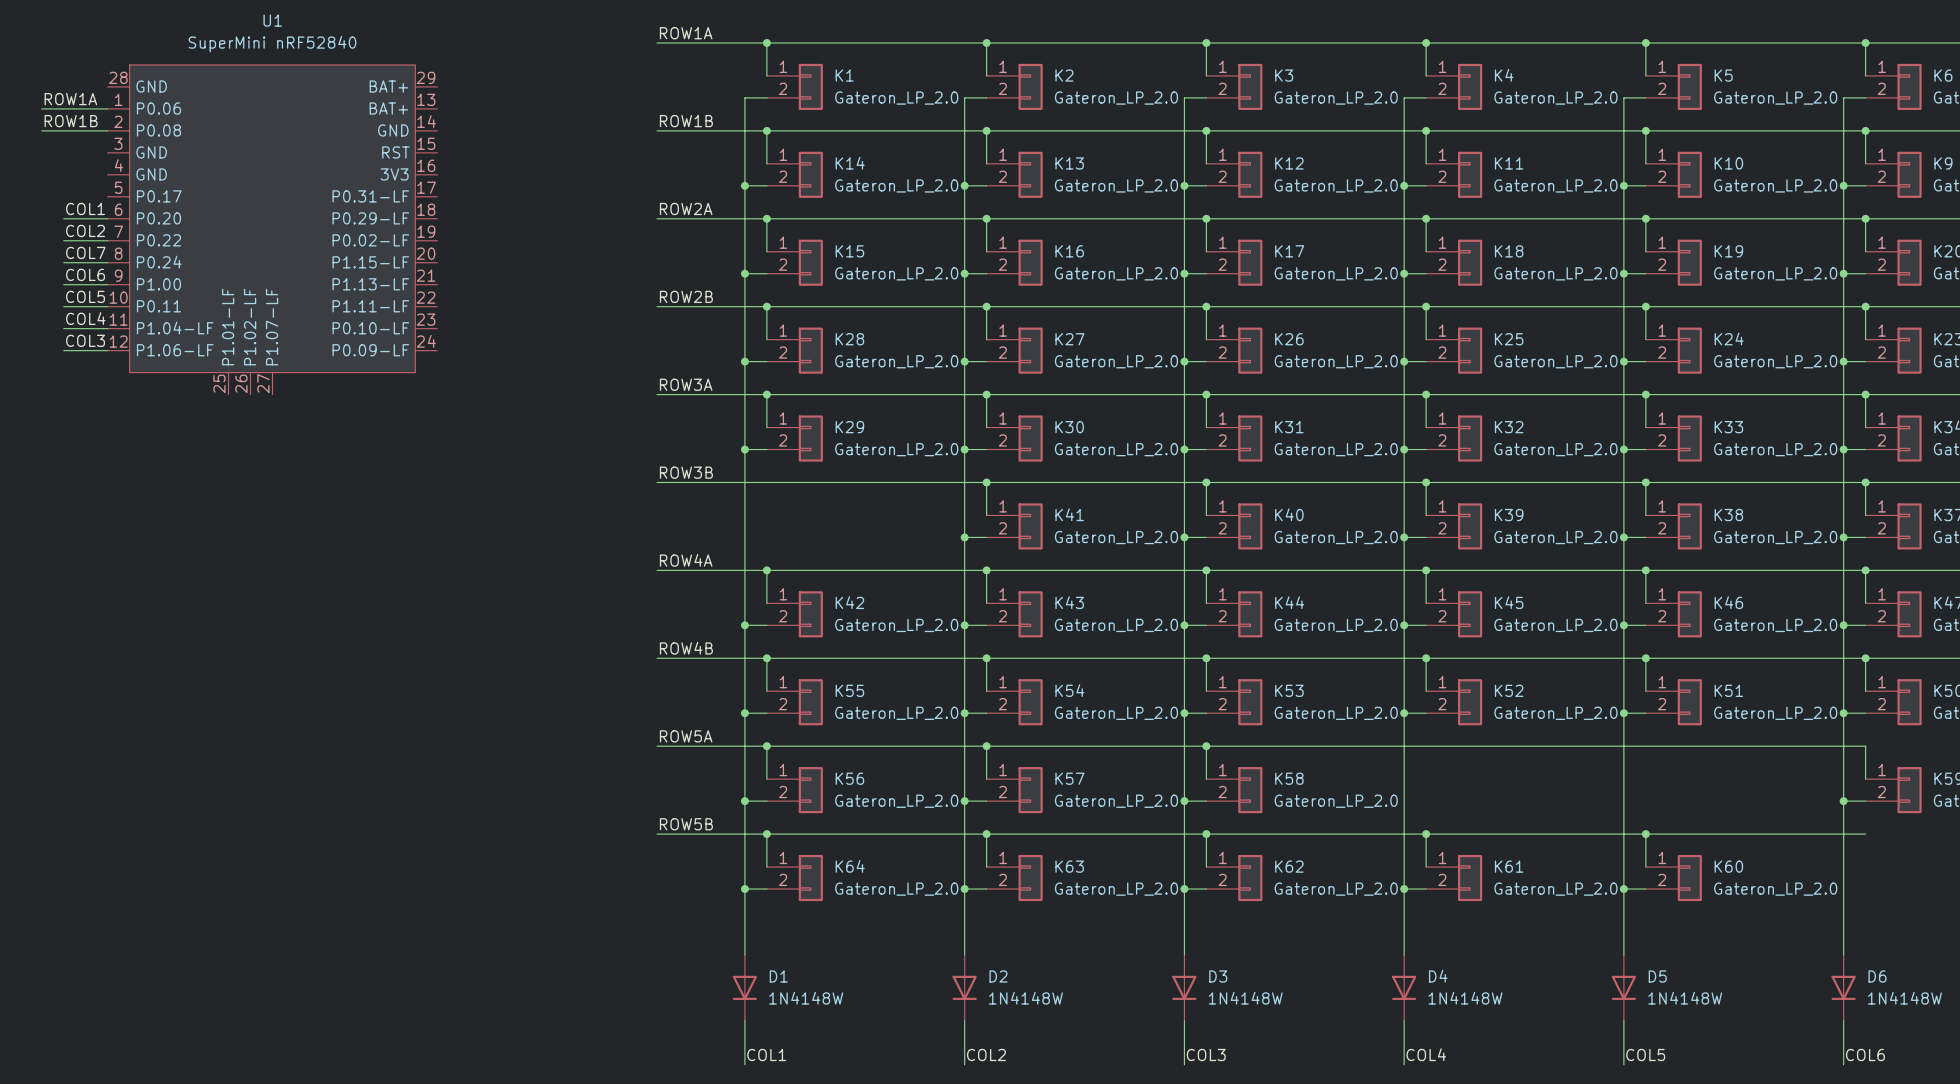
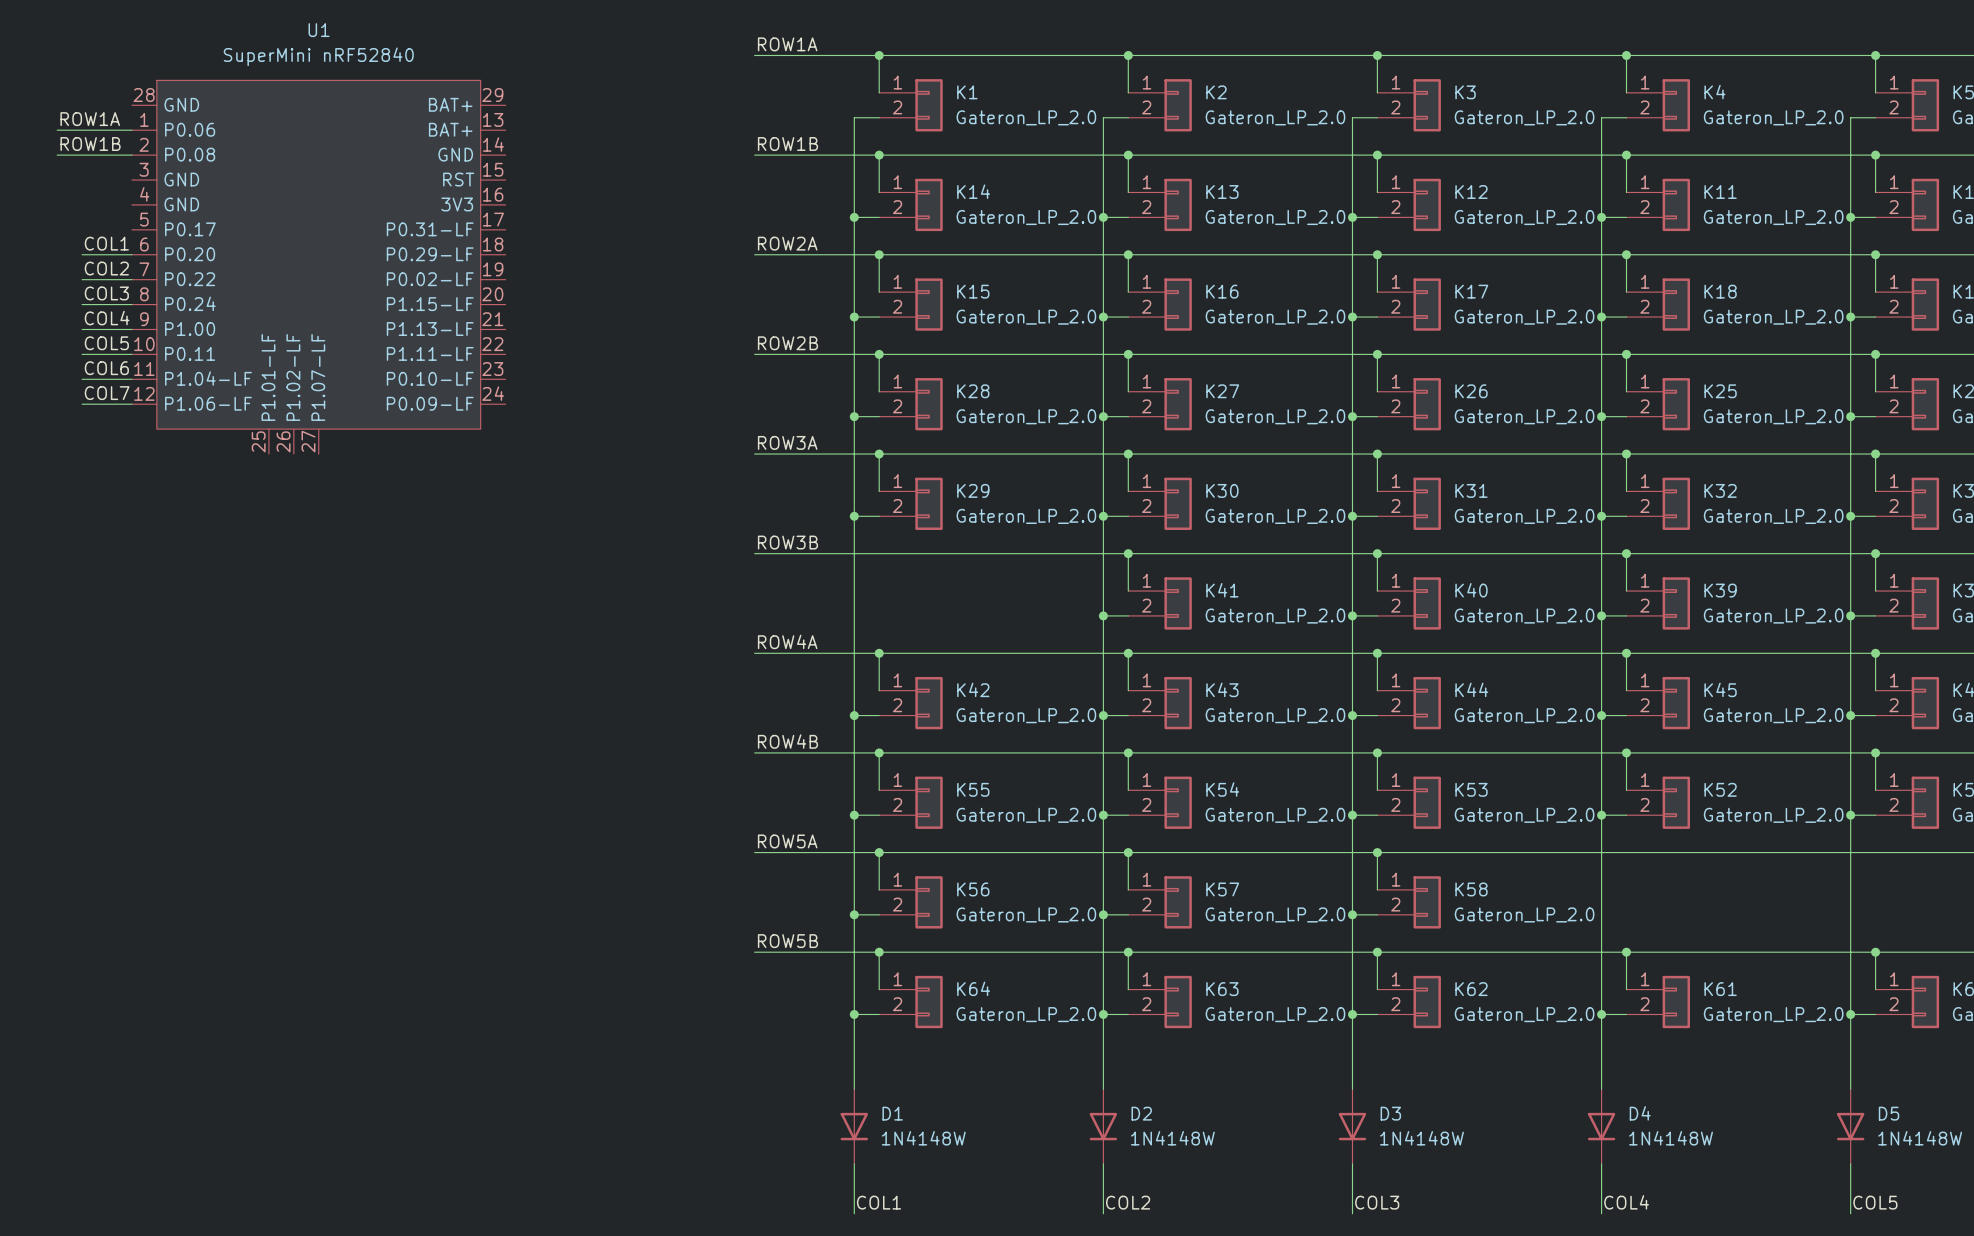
label: COL7 (85, 252) -> COL3 (106, 293)
label: COL6 (85, 274) -> COL4 (107, 318)
label: COL4 (85, 318) -> COL6 (106, 368)
label: COL3 (85, 340) -> COL7 (107, 393)

